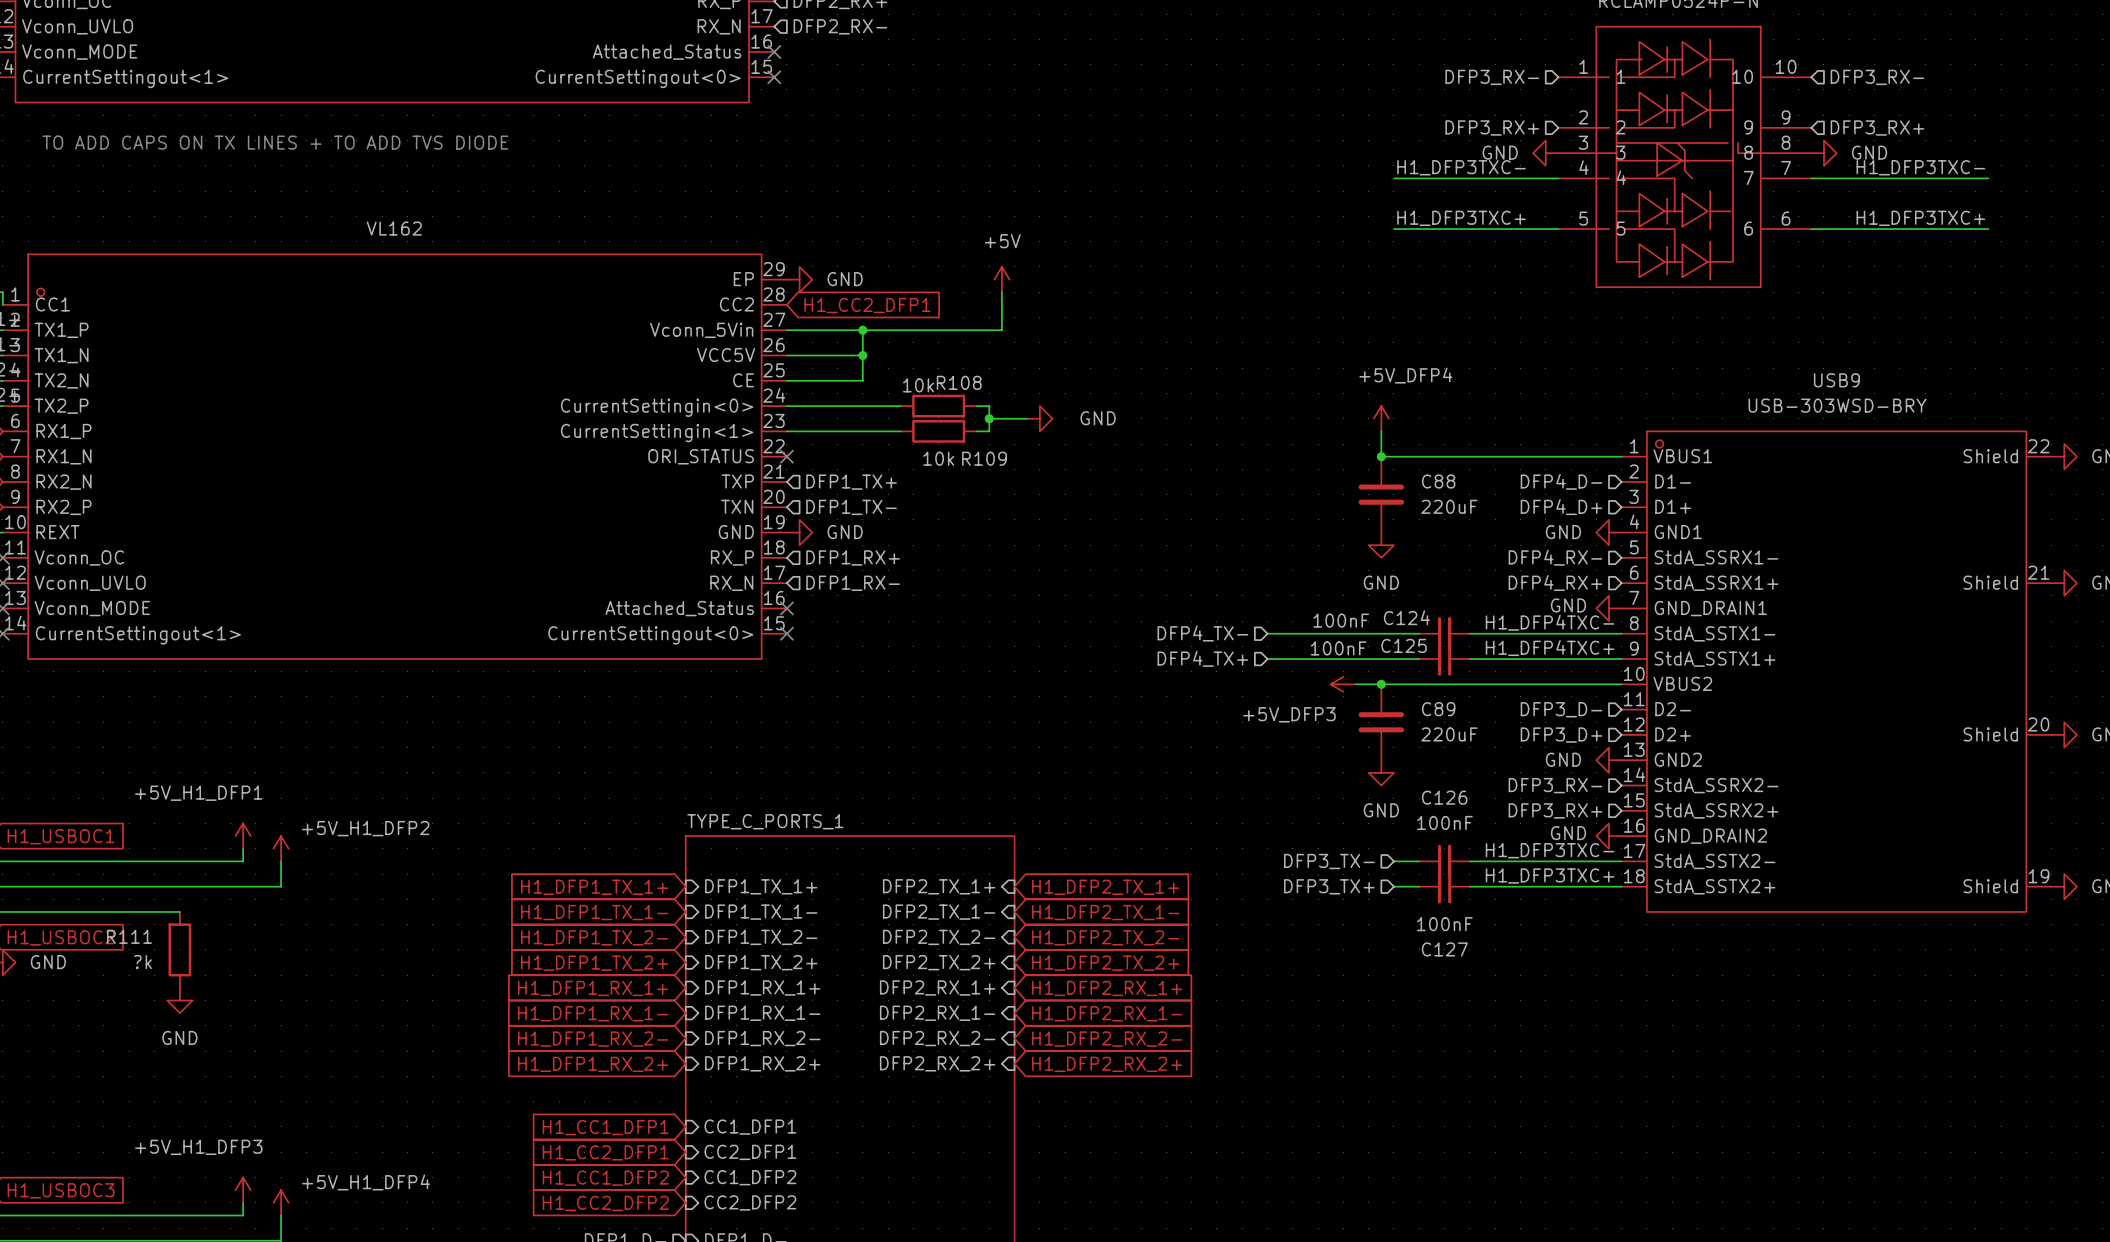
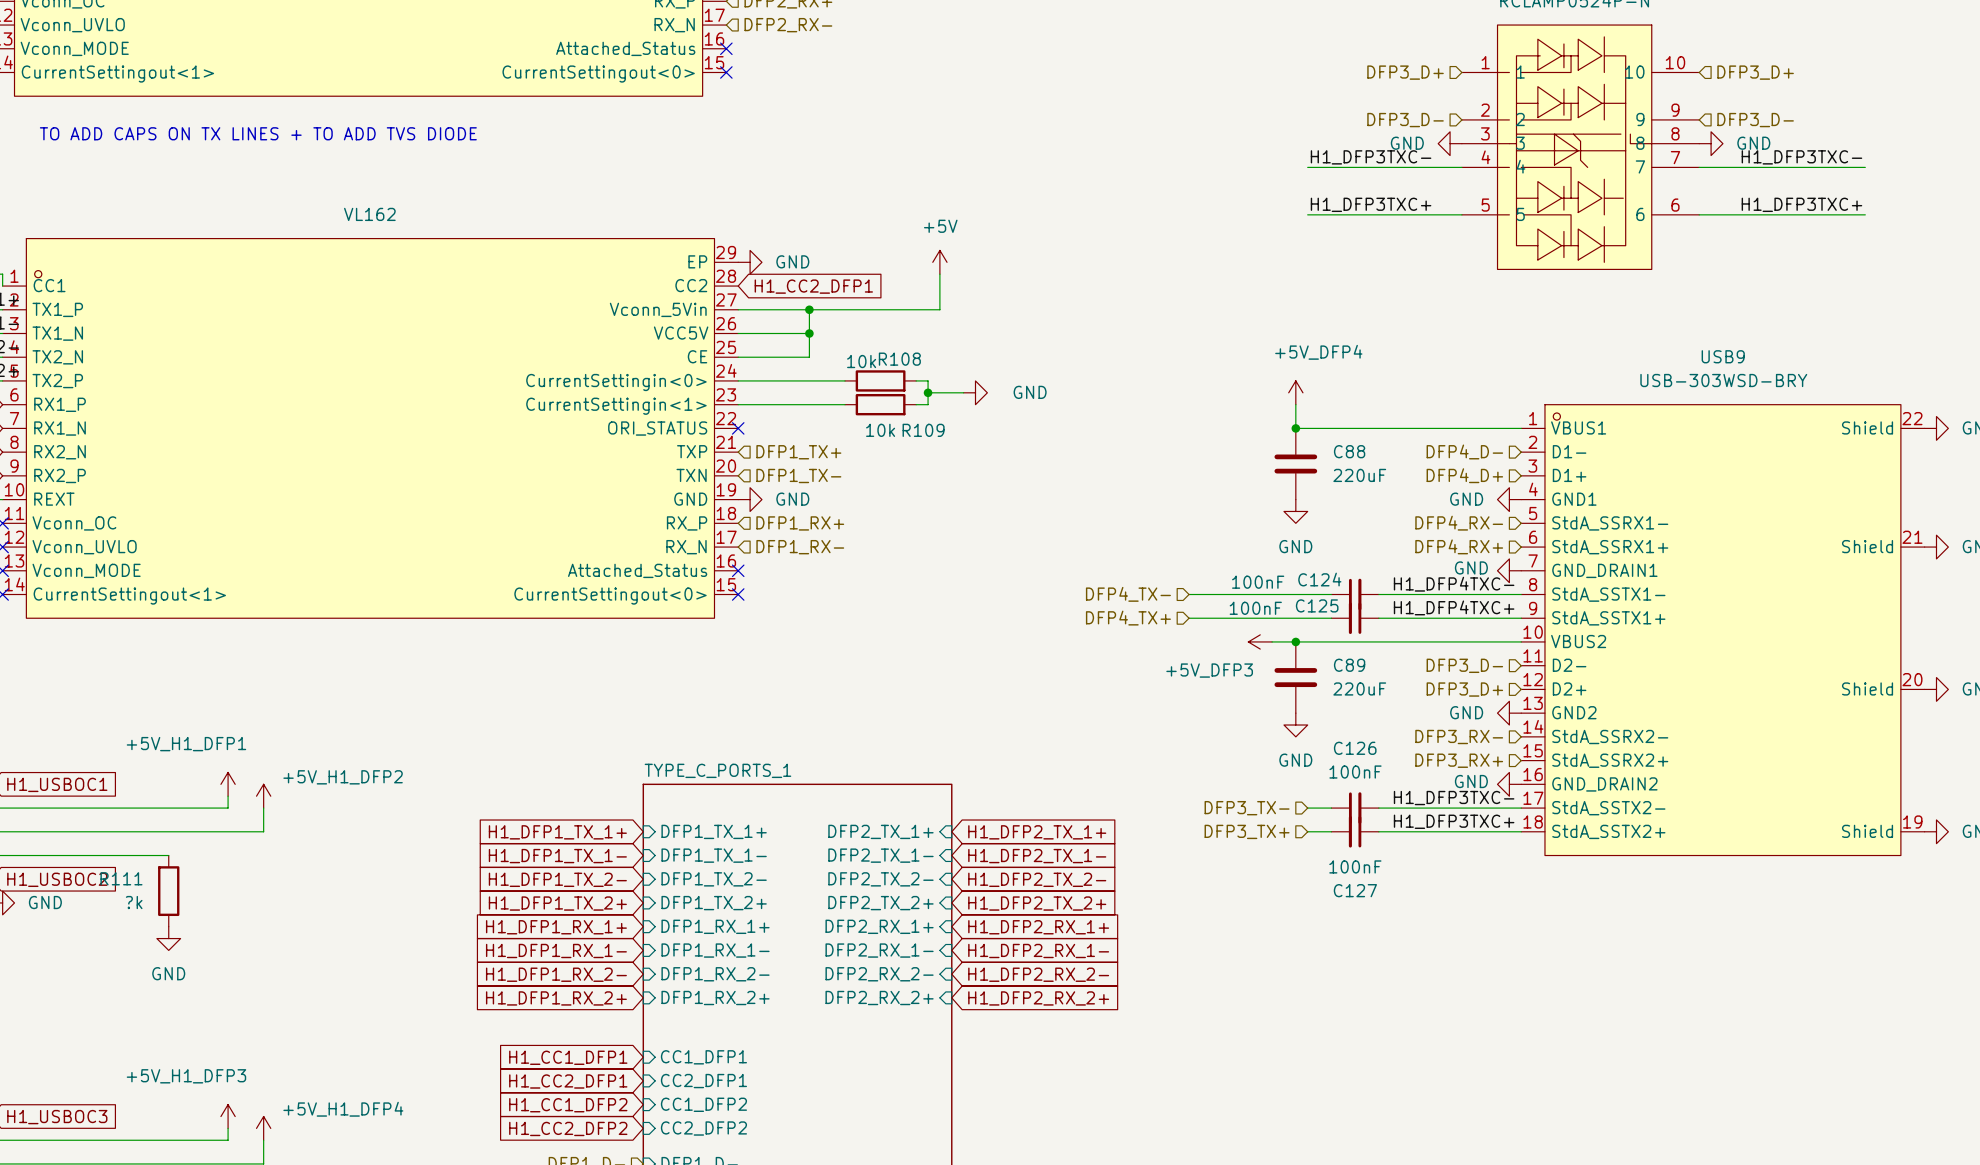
hierarchical label: DFP3_RX- (1492, 77) -> DFP3_D+ (1405, 72)
hierarchical label: DFP3_RX- (1877, 77) -> DFP3_D+ (1755, 72)
hierarchical label: DFP3_RX+ (1492, 127) -> DFP3_D- (1405, 120)
hierarchical label: DFP3_RX+ (1877, 127) -> DFP3_D- (1755, 120)

